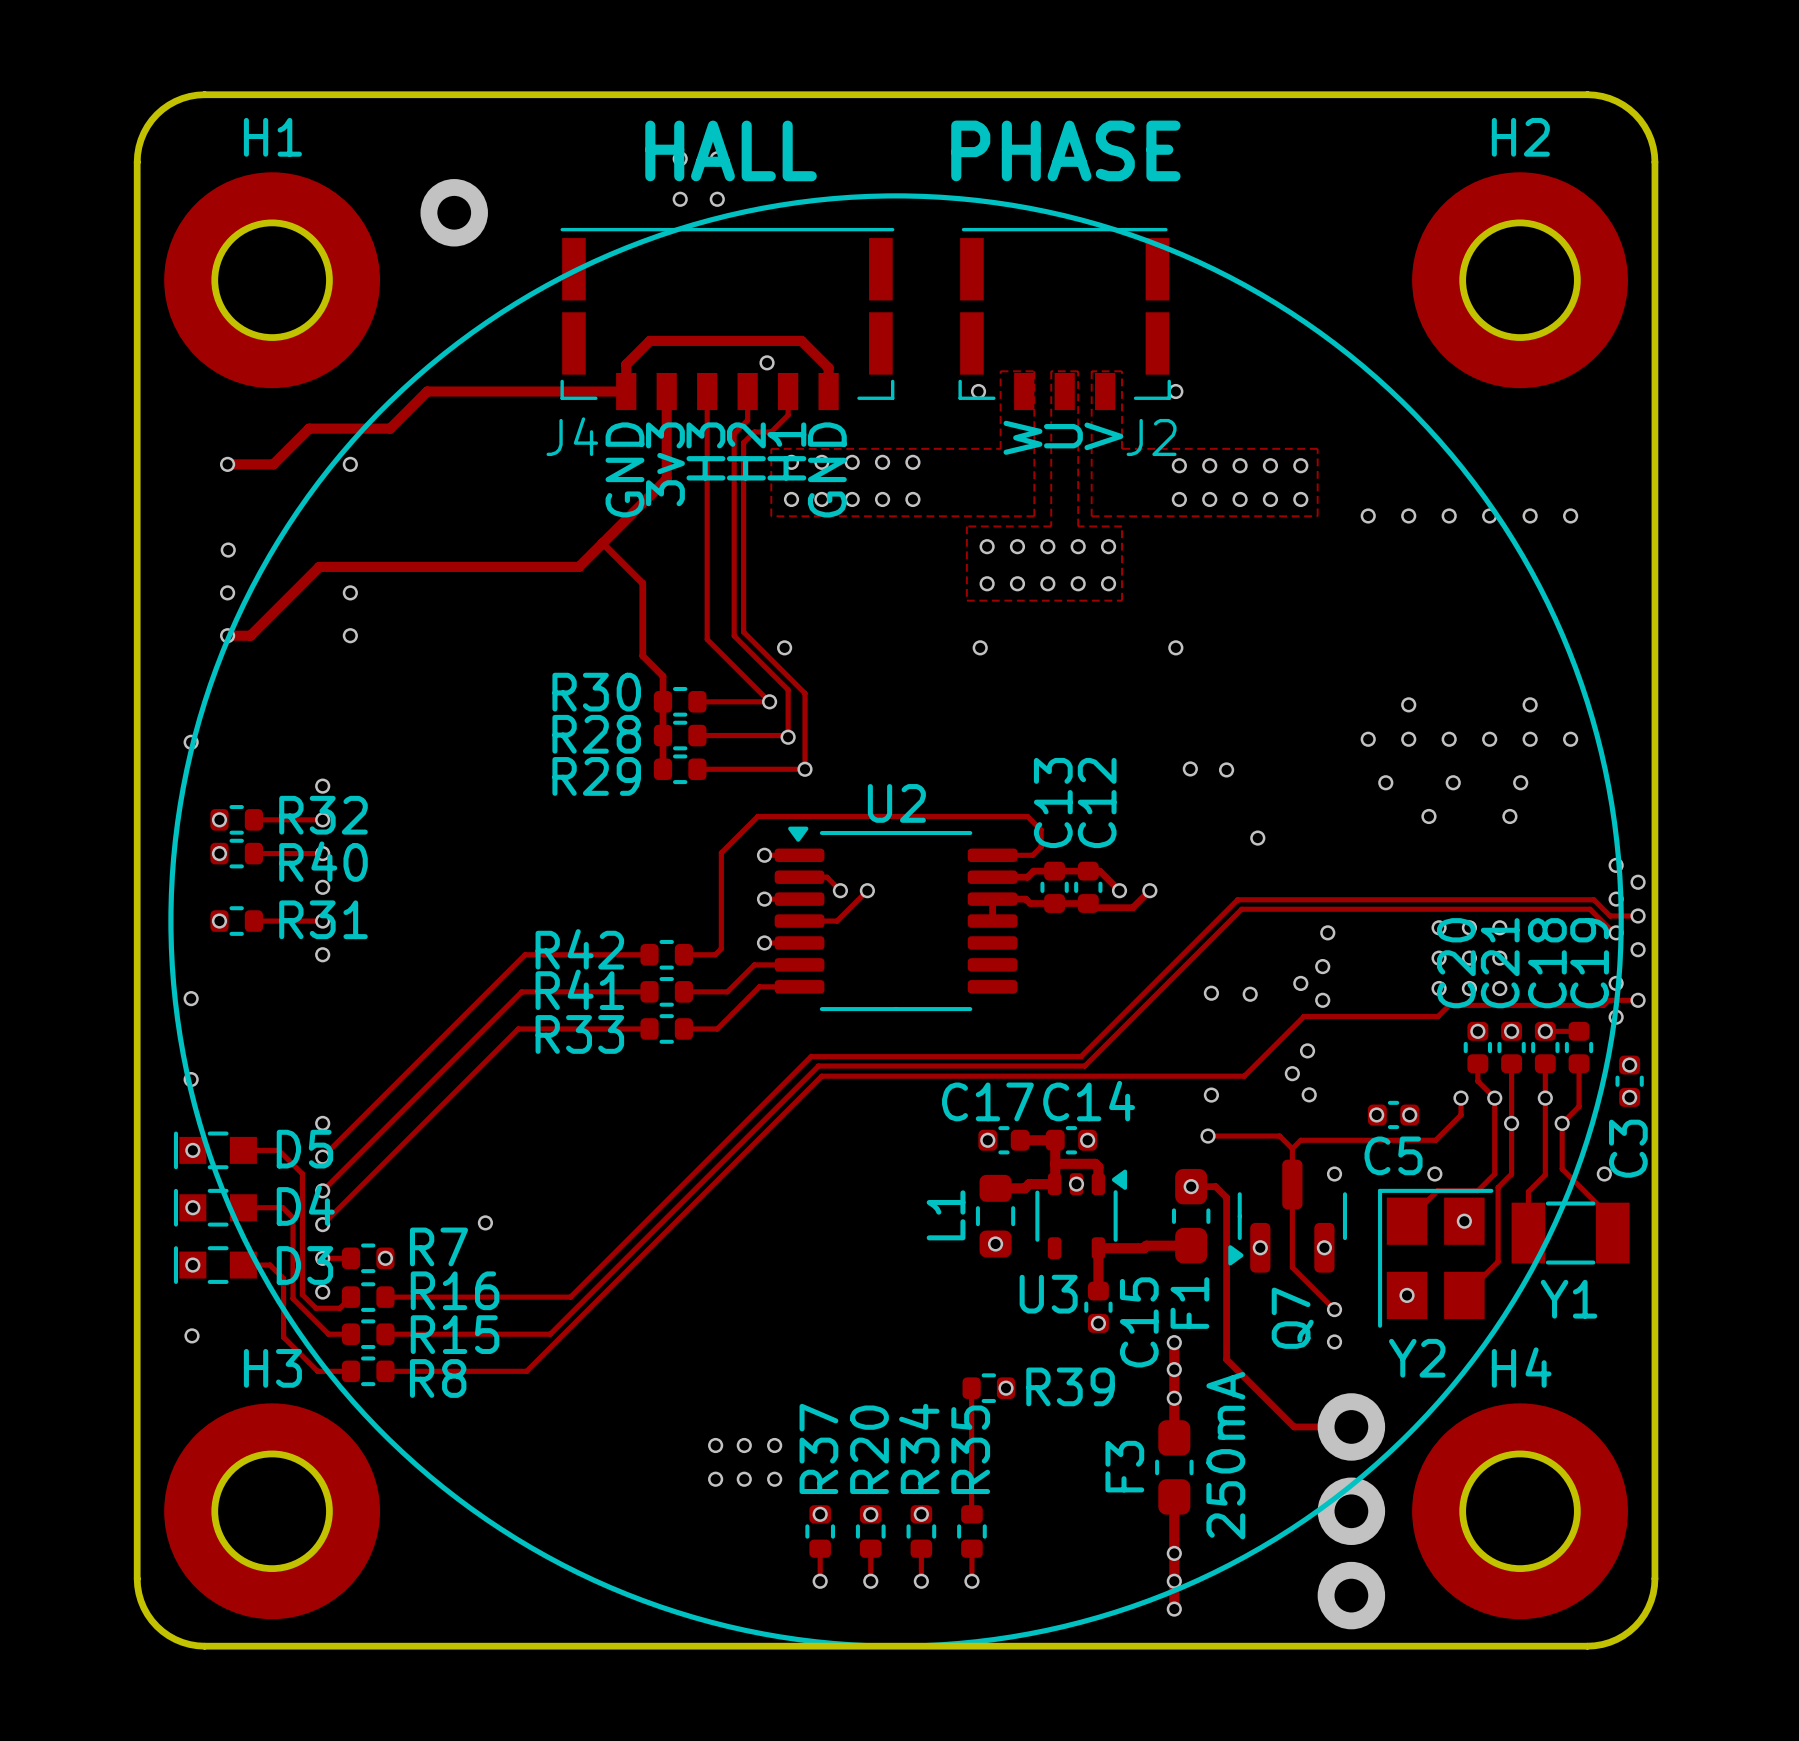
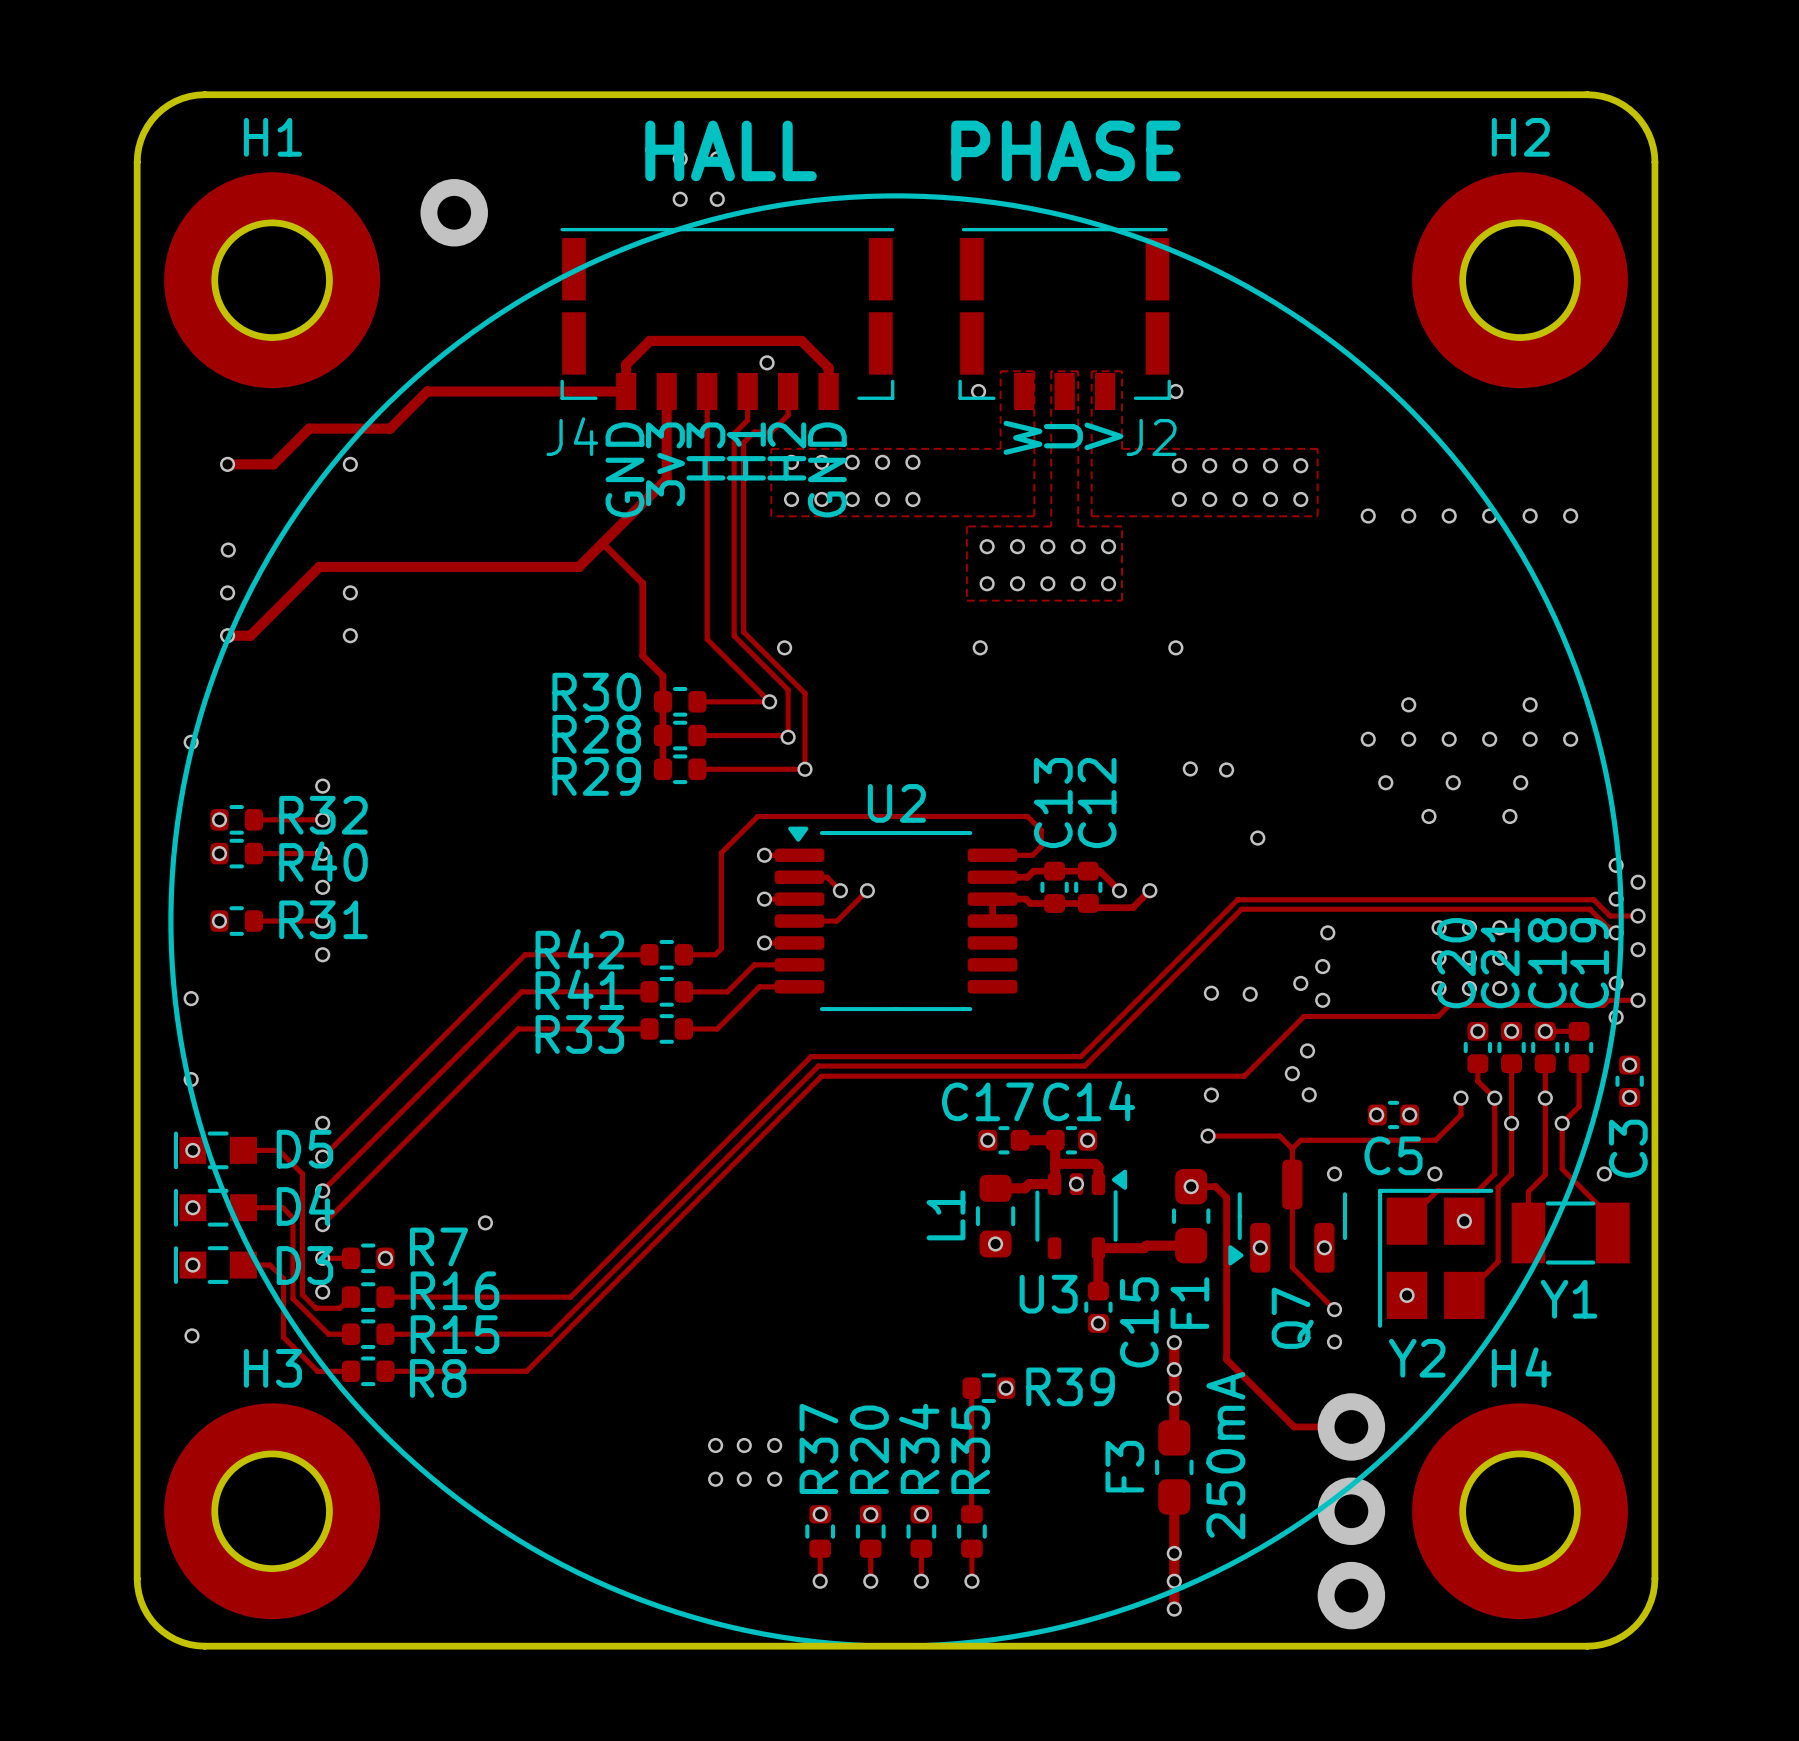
text: H2 (746, 451) -> H1 (746, 451)
text: H1 (786, 451) -> H2 (786, 451)

